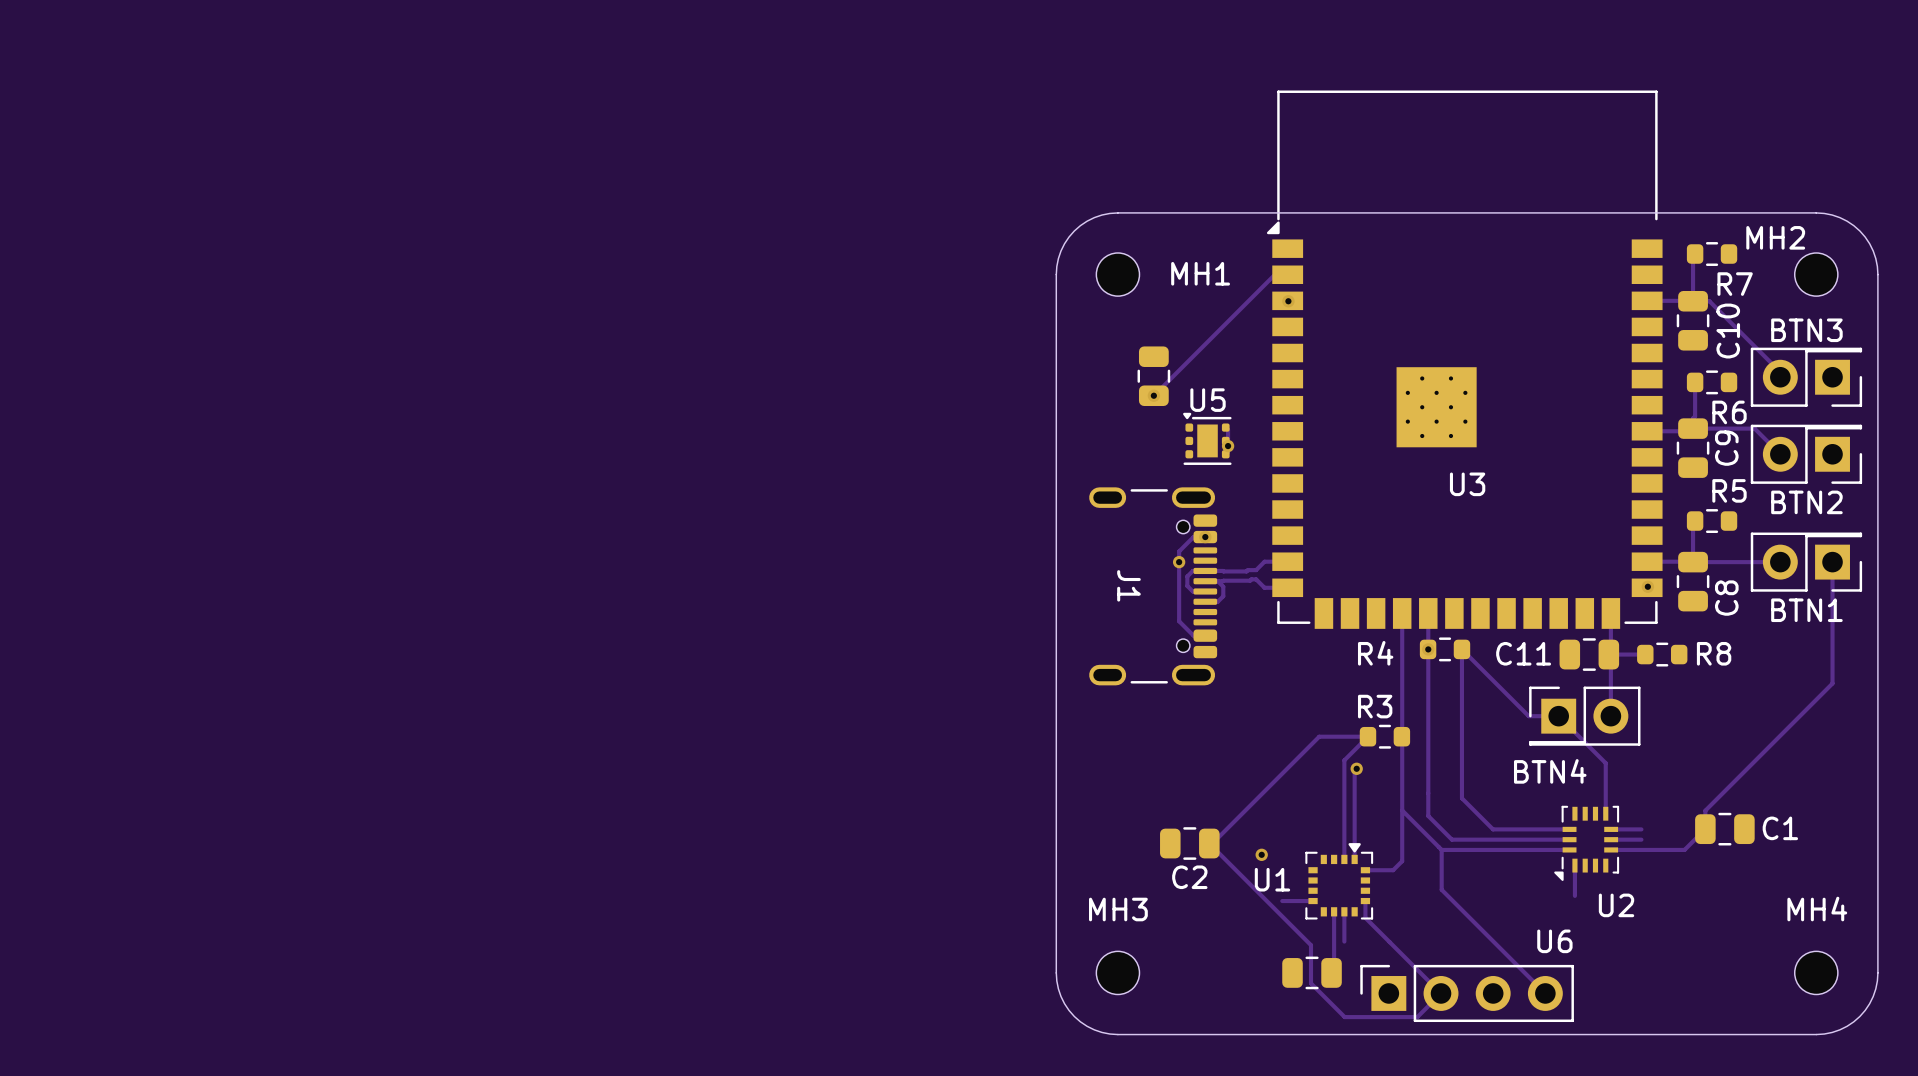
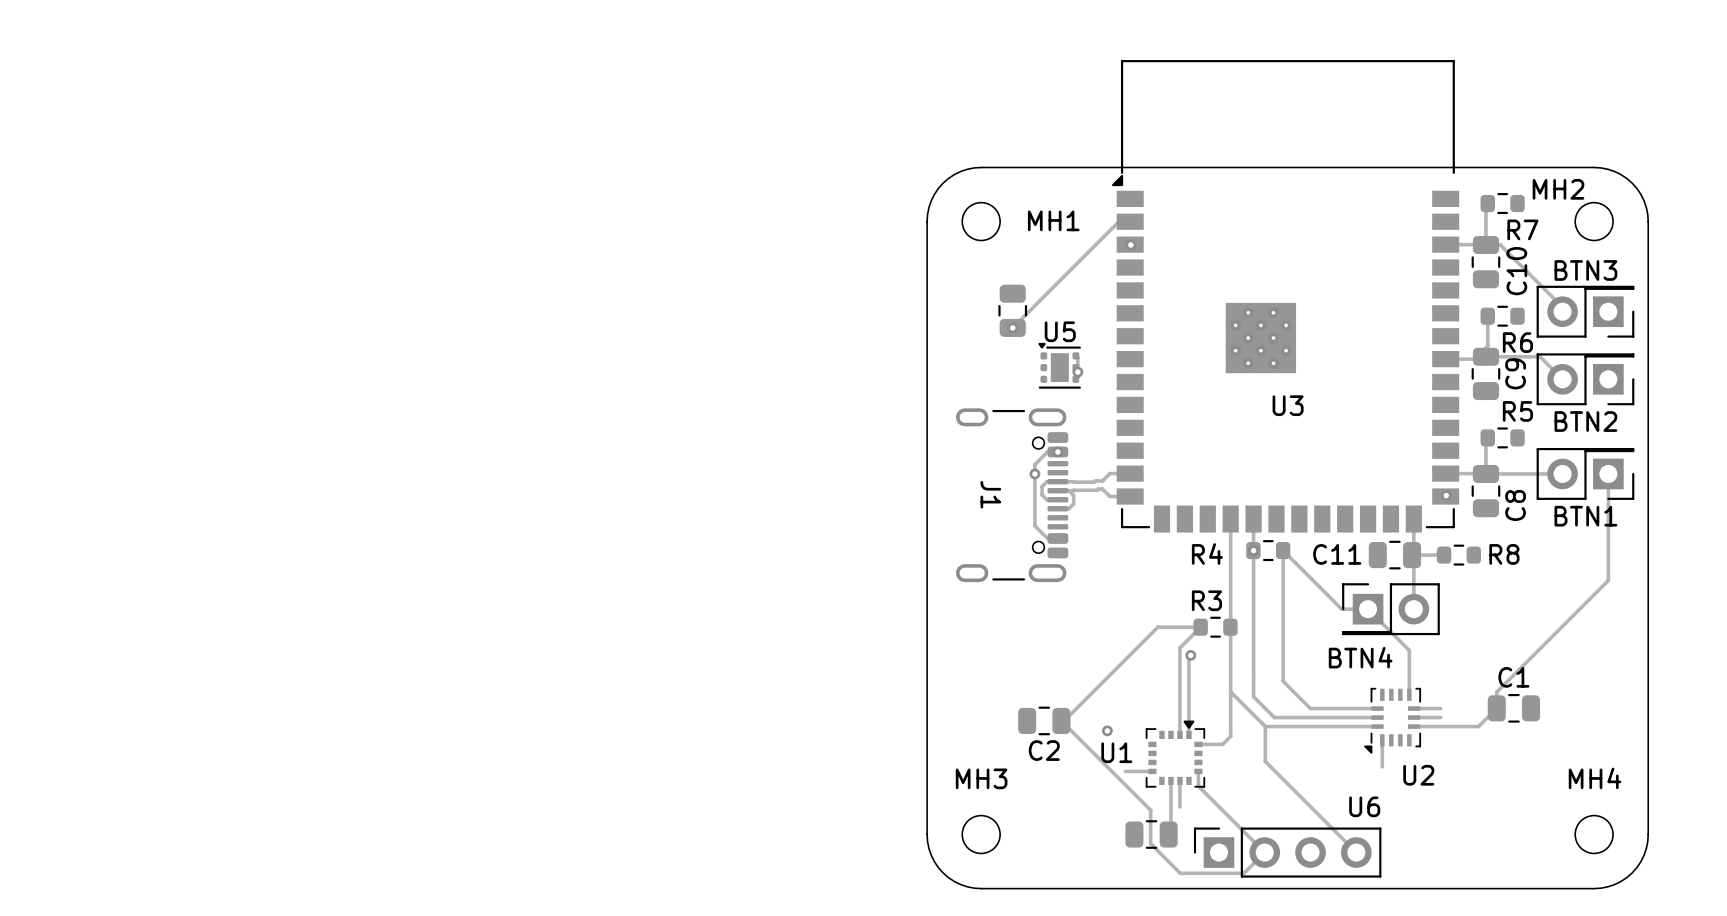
C1 name position: C1 (1780, 828) -> C1 (1513, 677)

